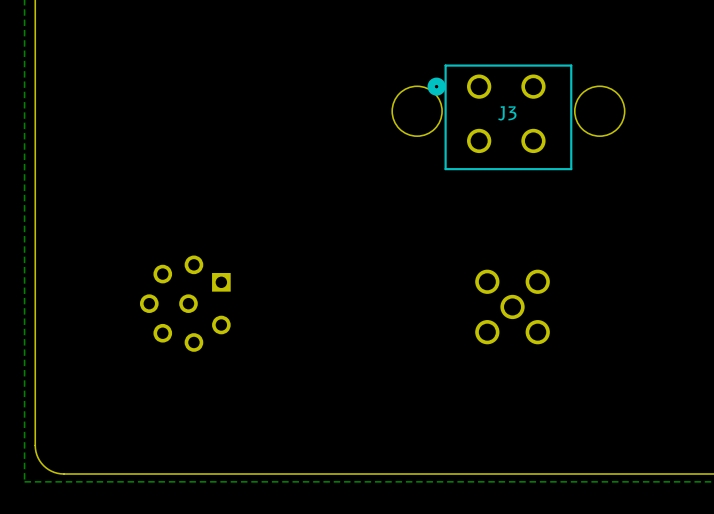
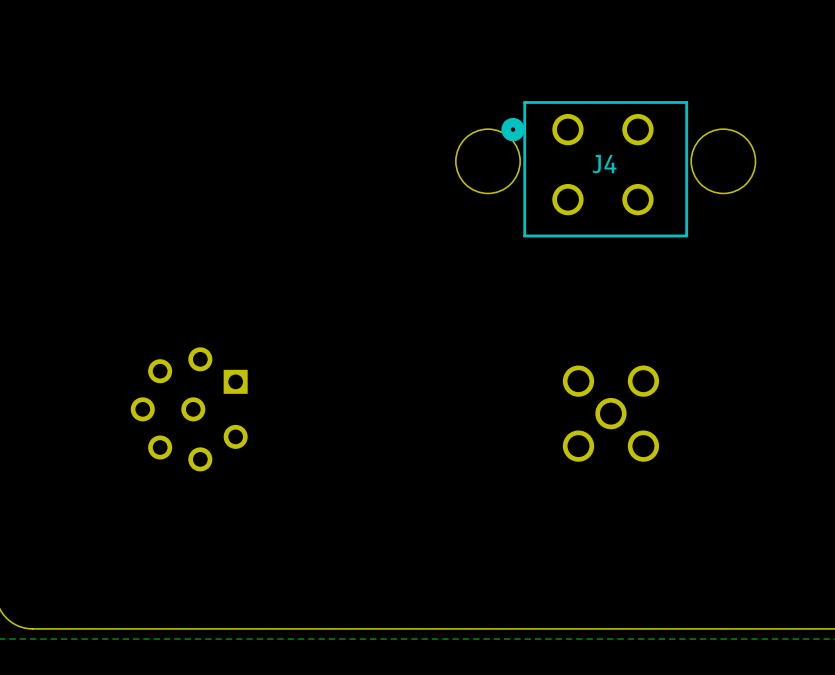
J3 name: J3 (507, 113) -> J4 (604, 164)

